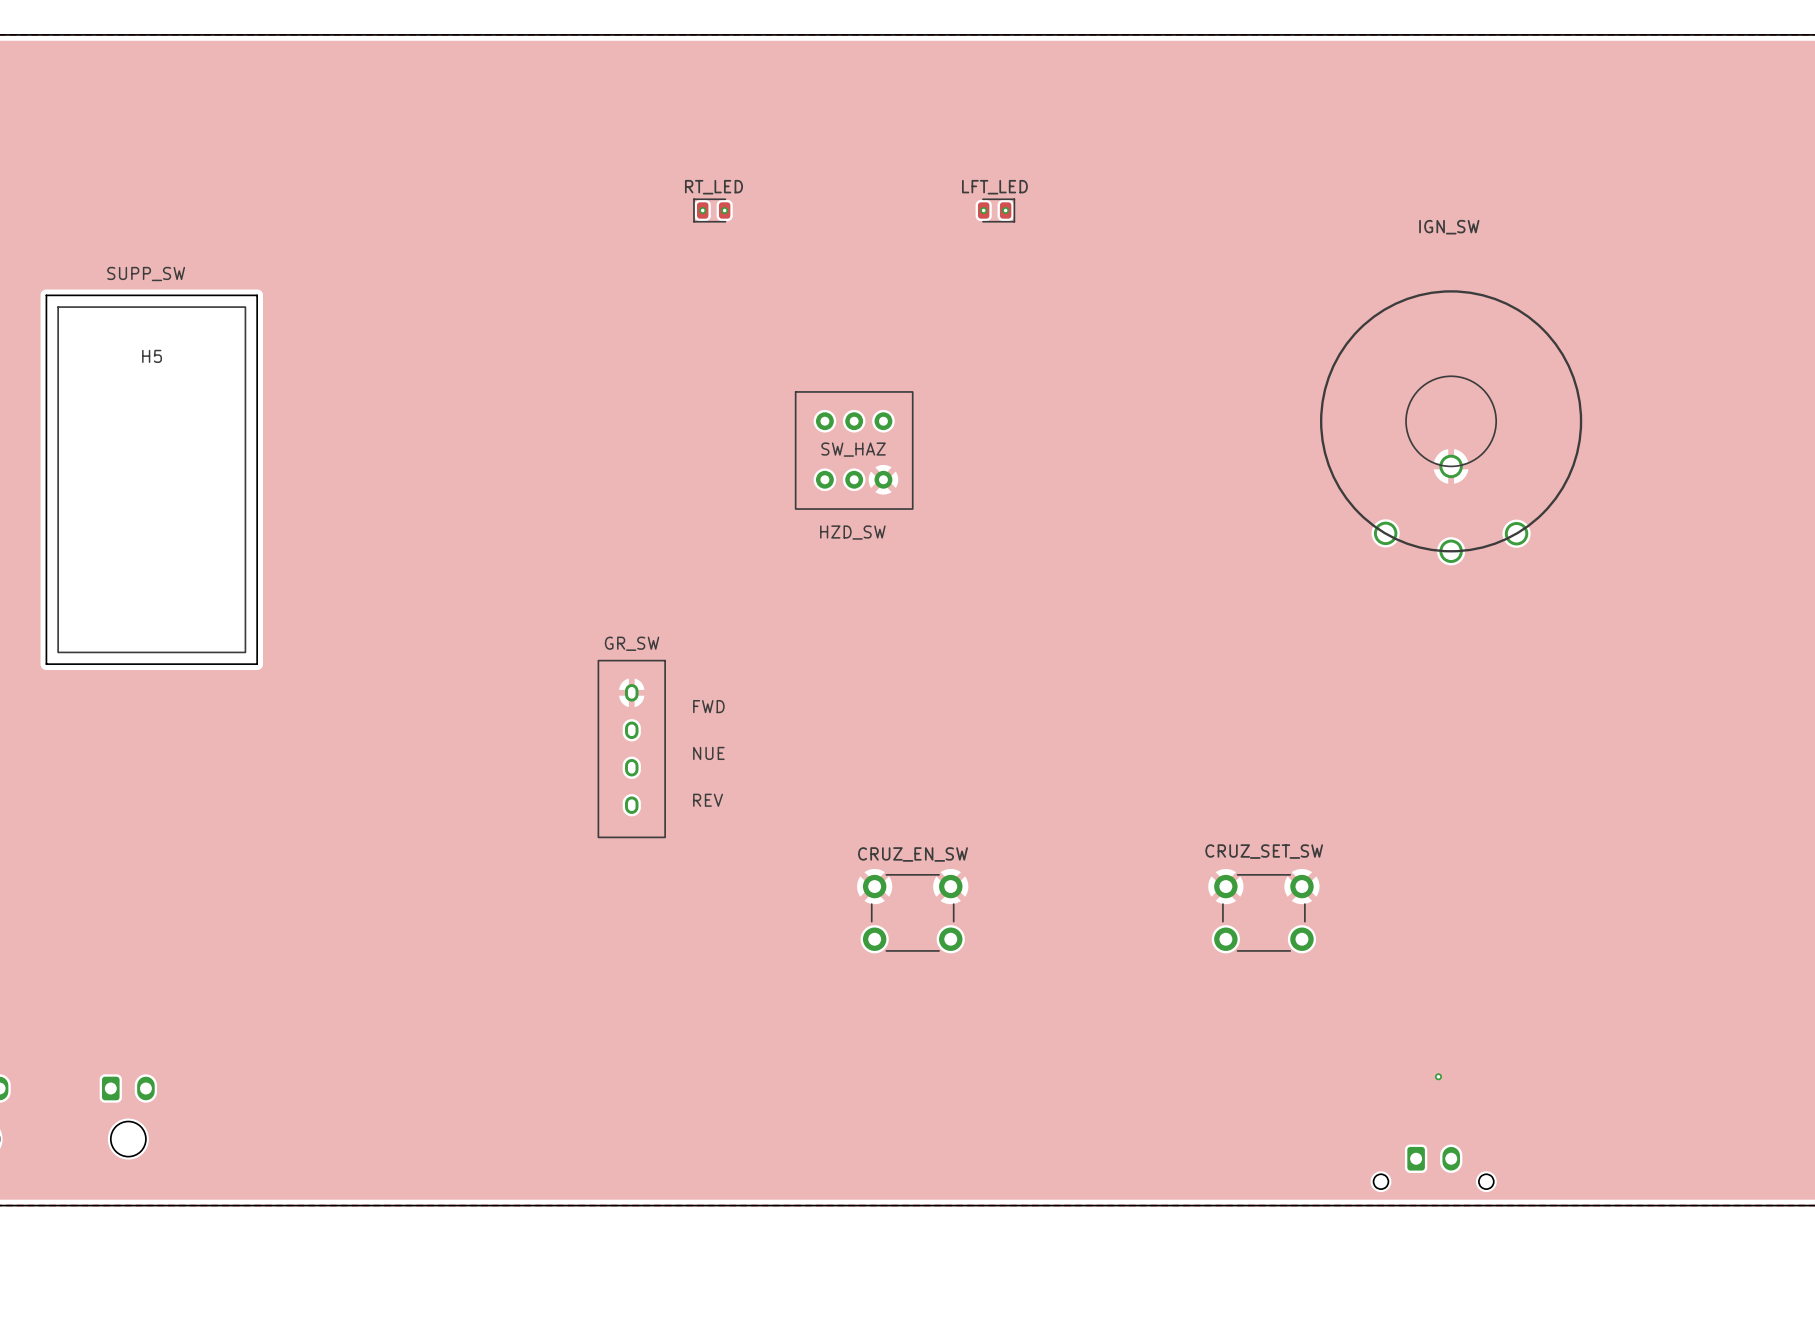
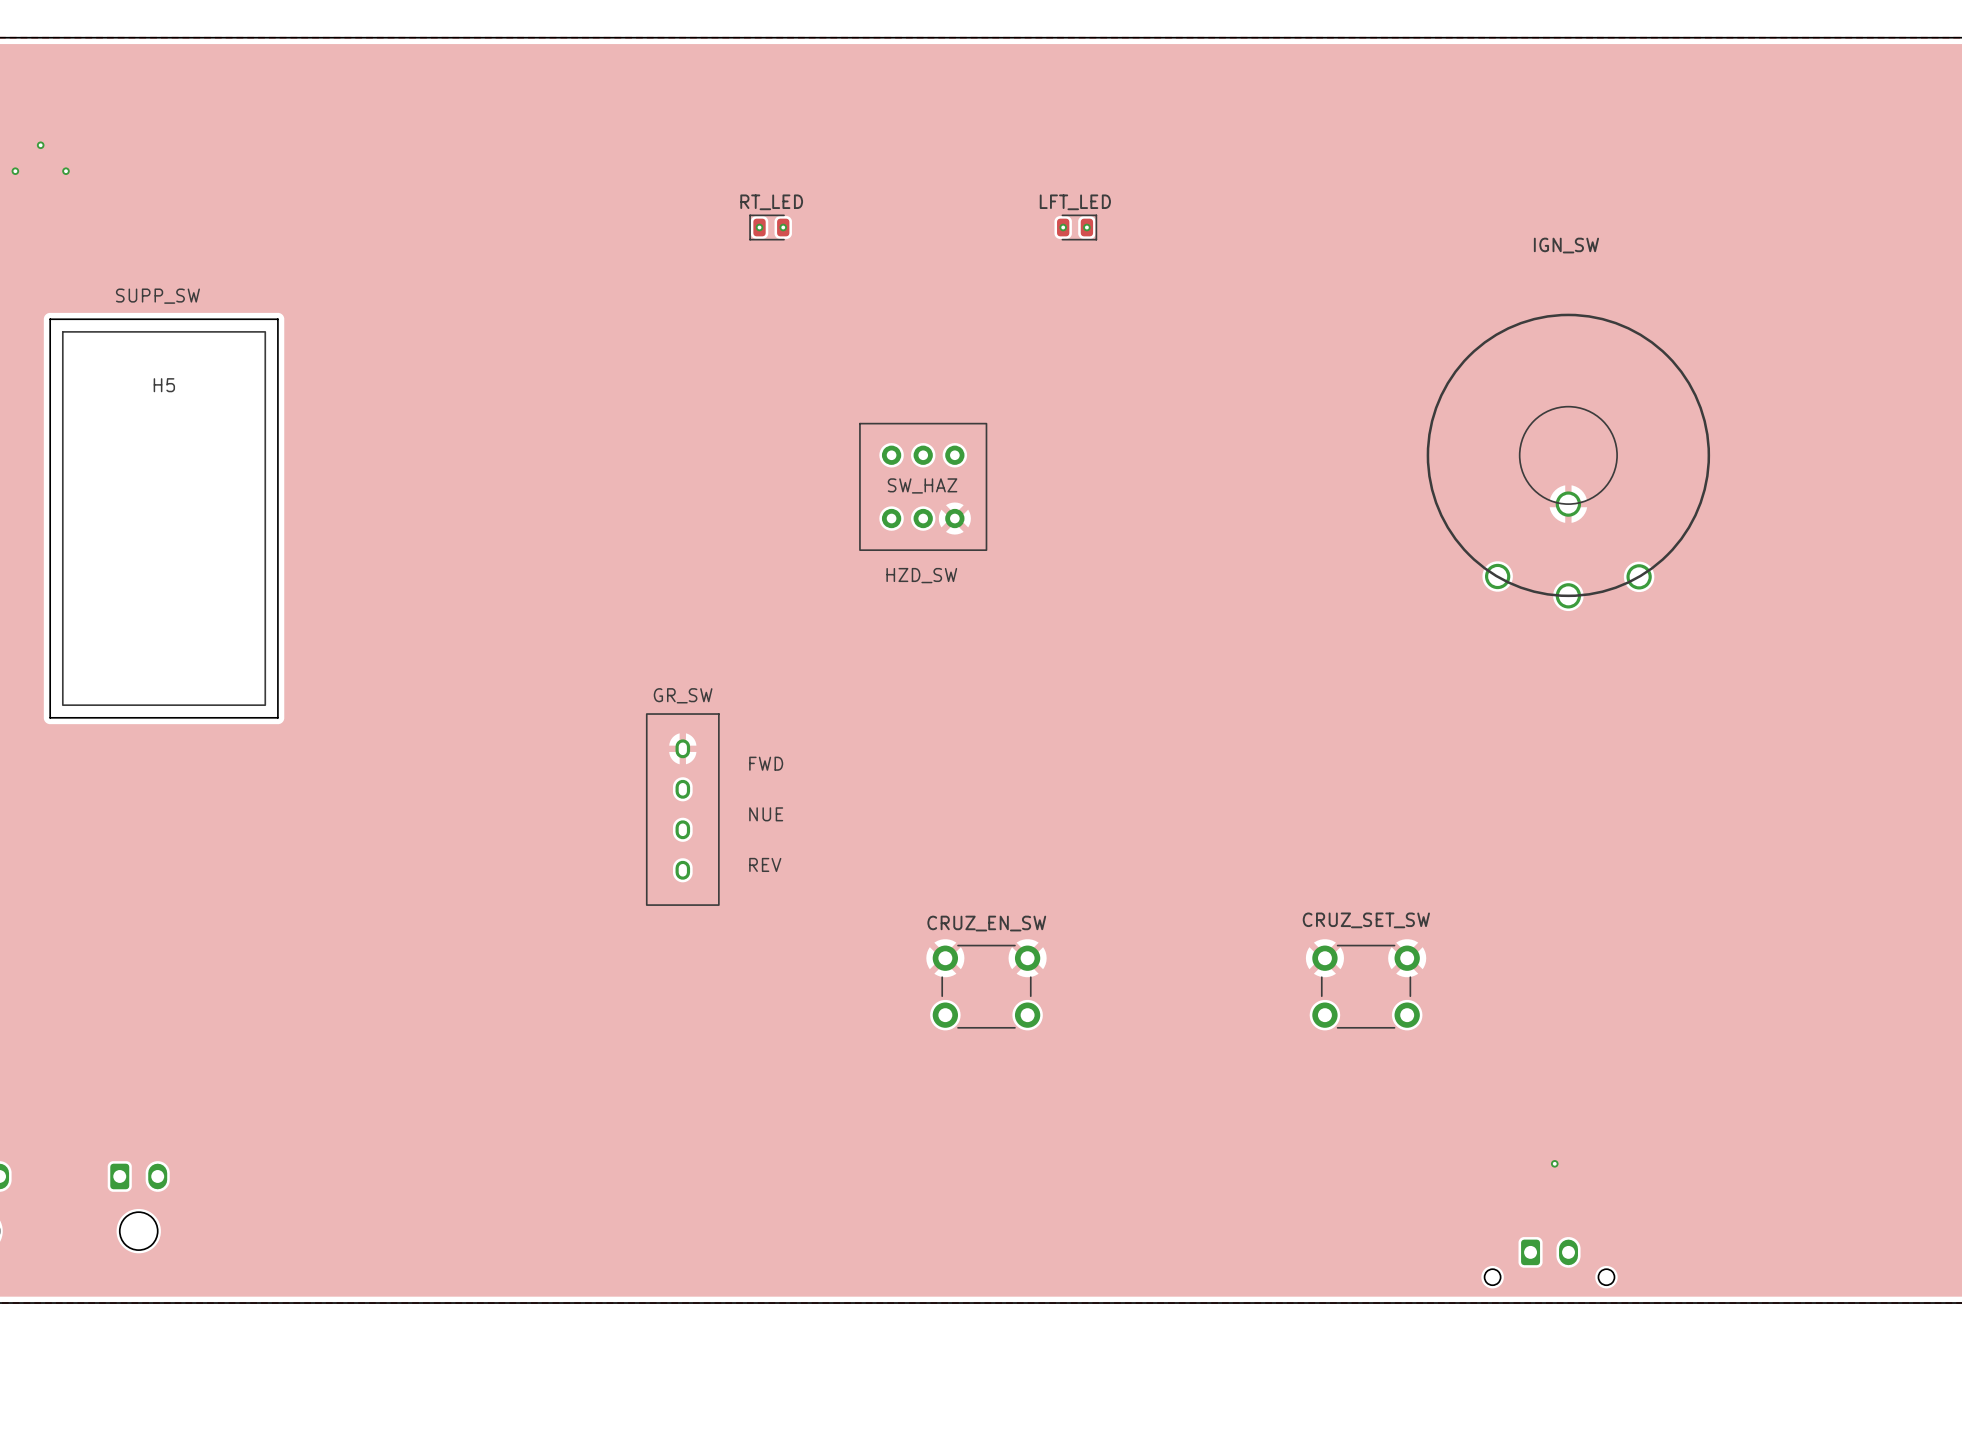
via: none -> (40, 145)
via: none -> (15, 171)
via: none -> (65, 171)

